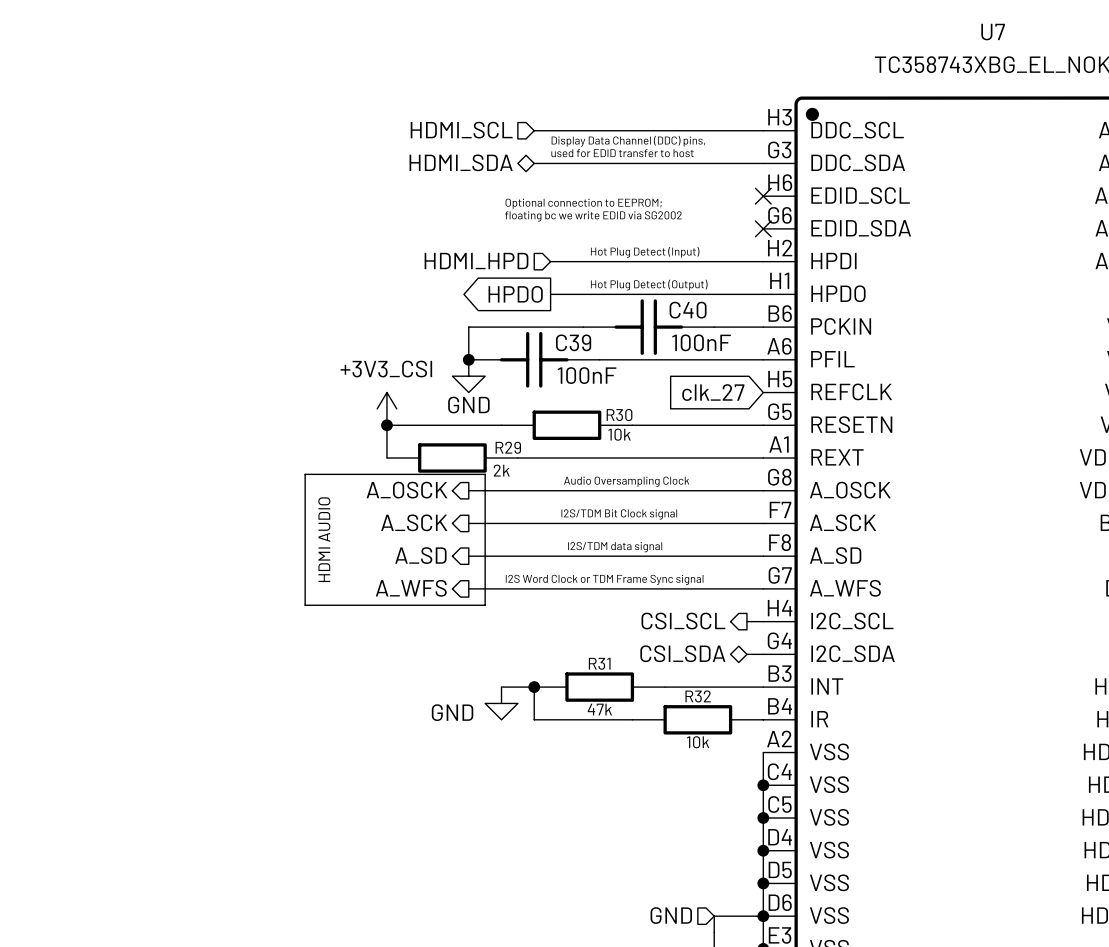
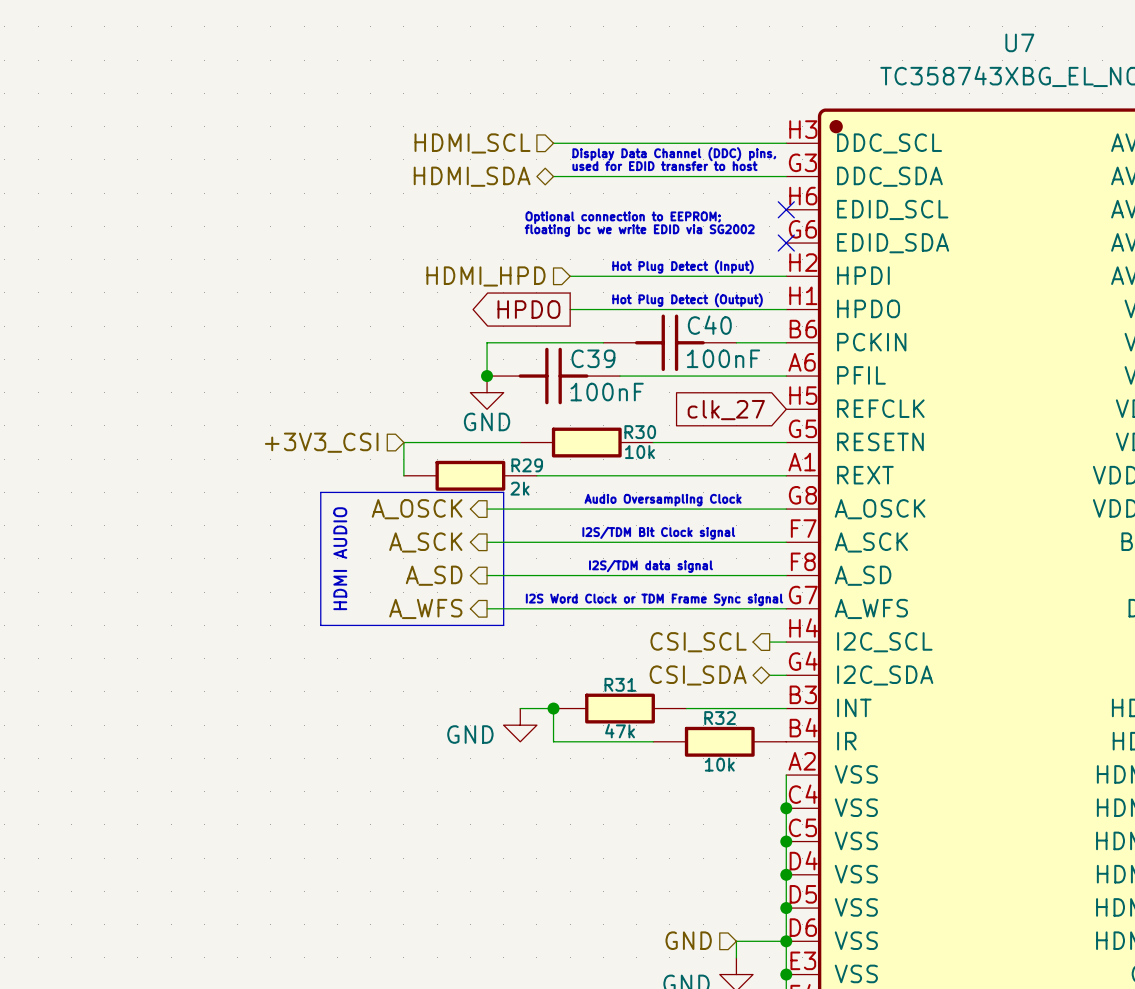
power symbol: +3V3_CSI (386, 408) -> none
hierarchical label: none -> +3V3_CSI (321, 442)
junction: (386, 425) -> none

